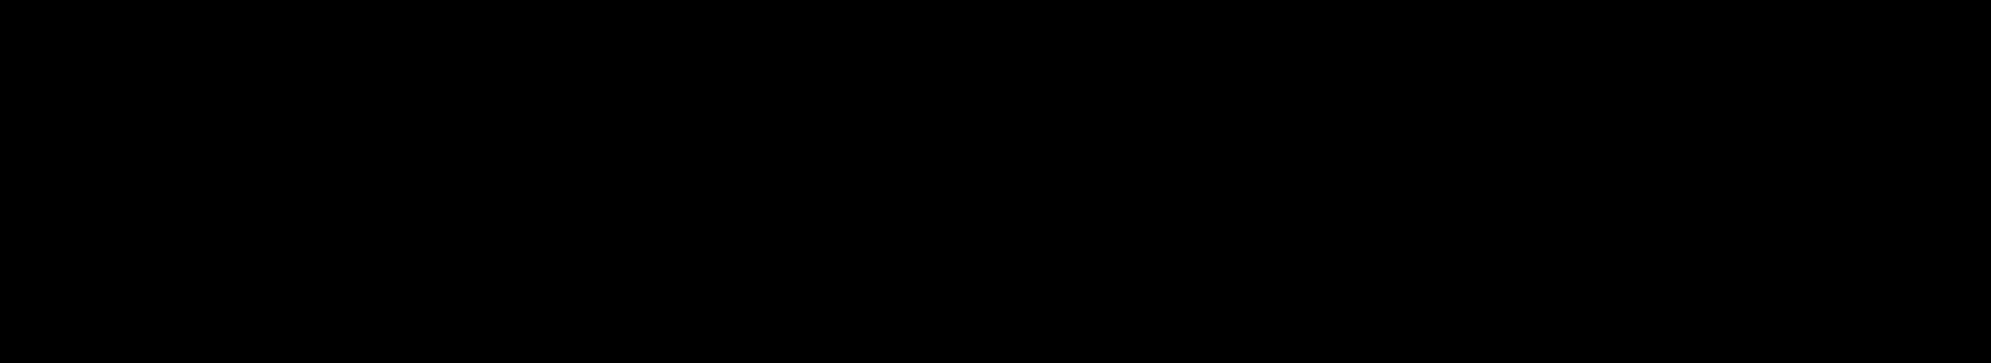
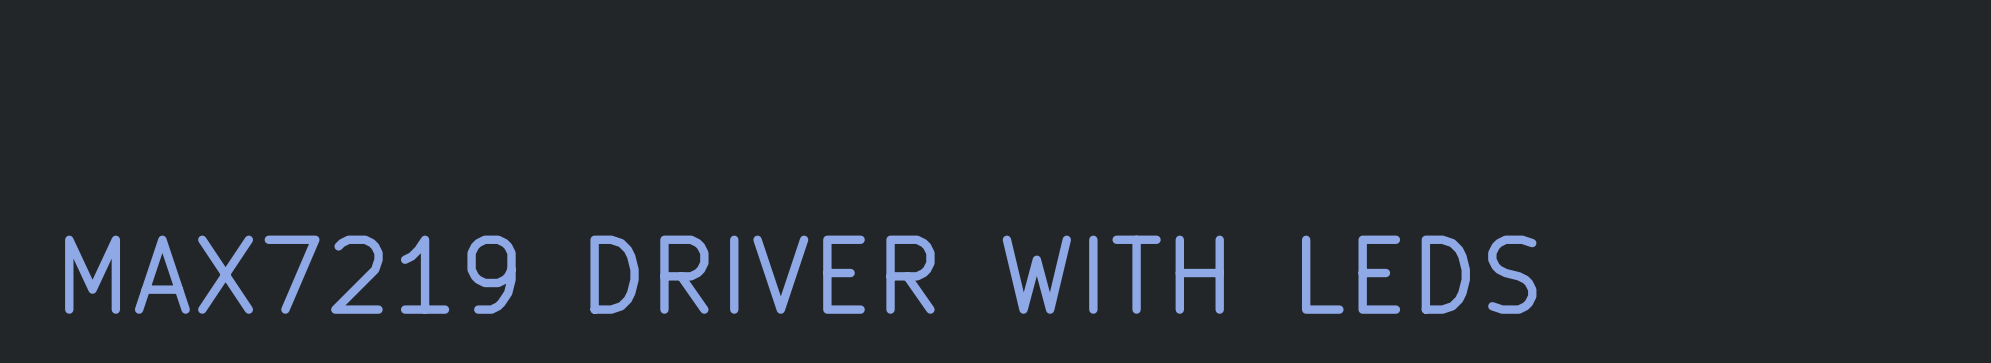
text: none -> MAX7219 DRIVER WITH LEDS (800, 274)

